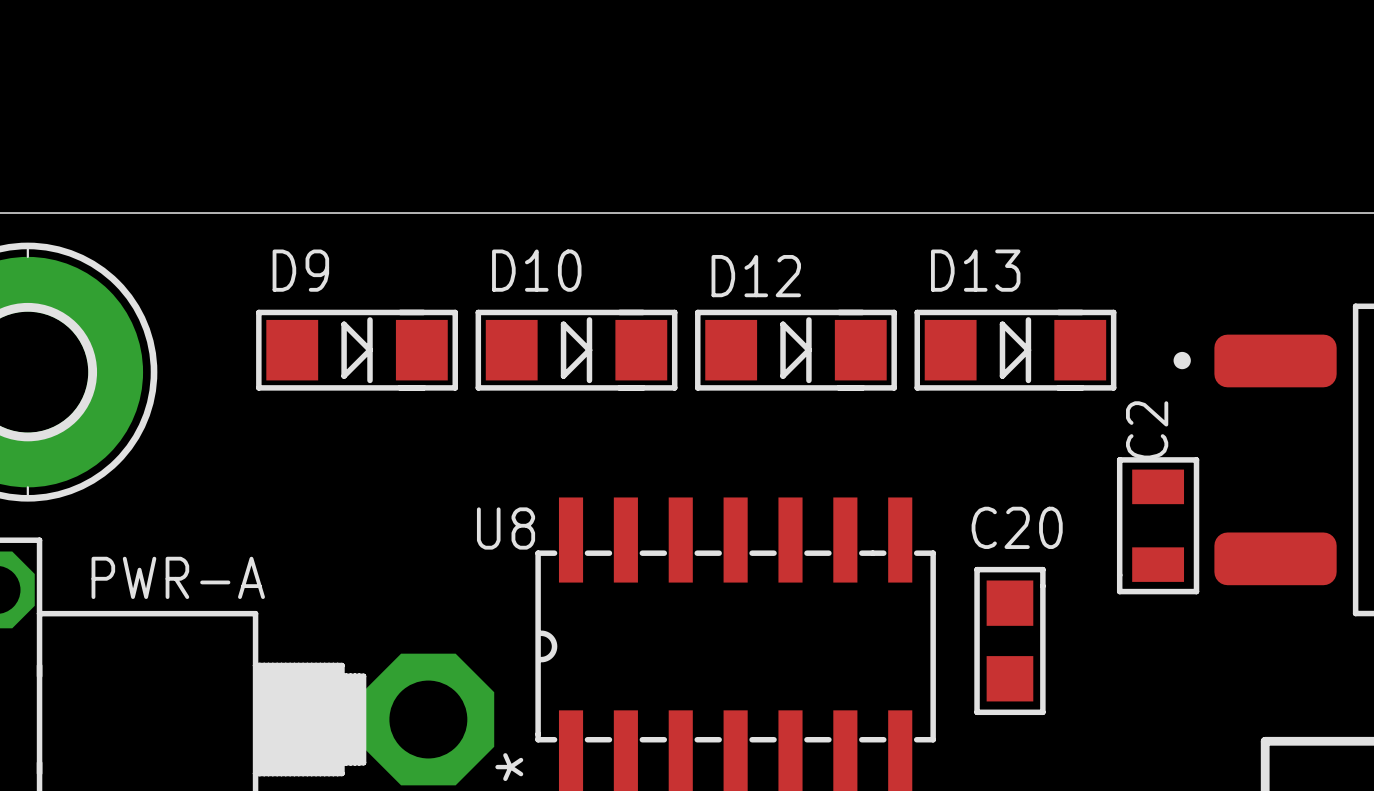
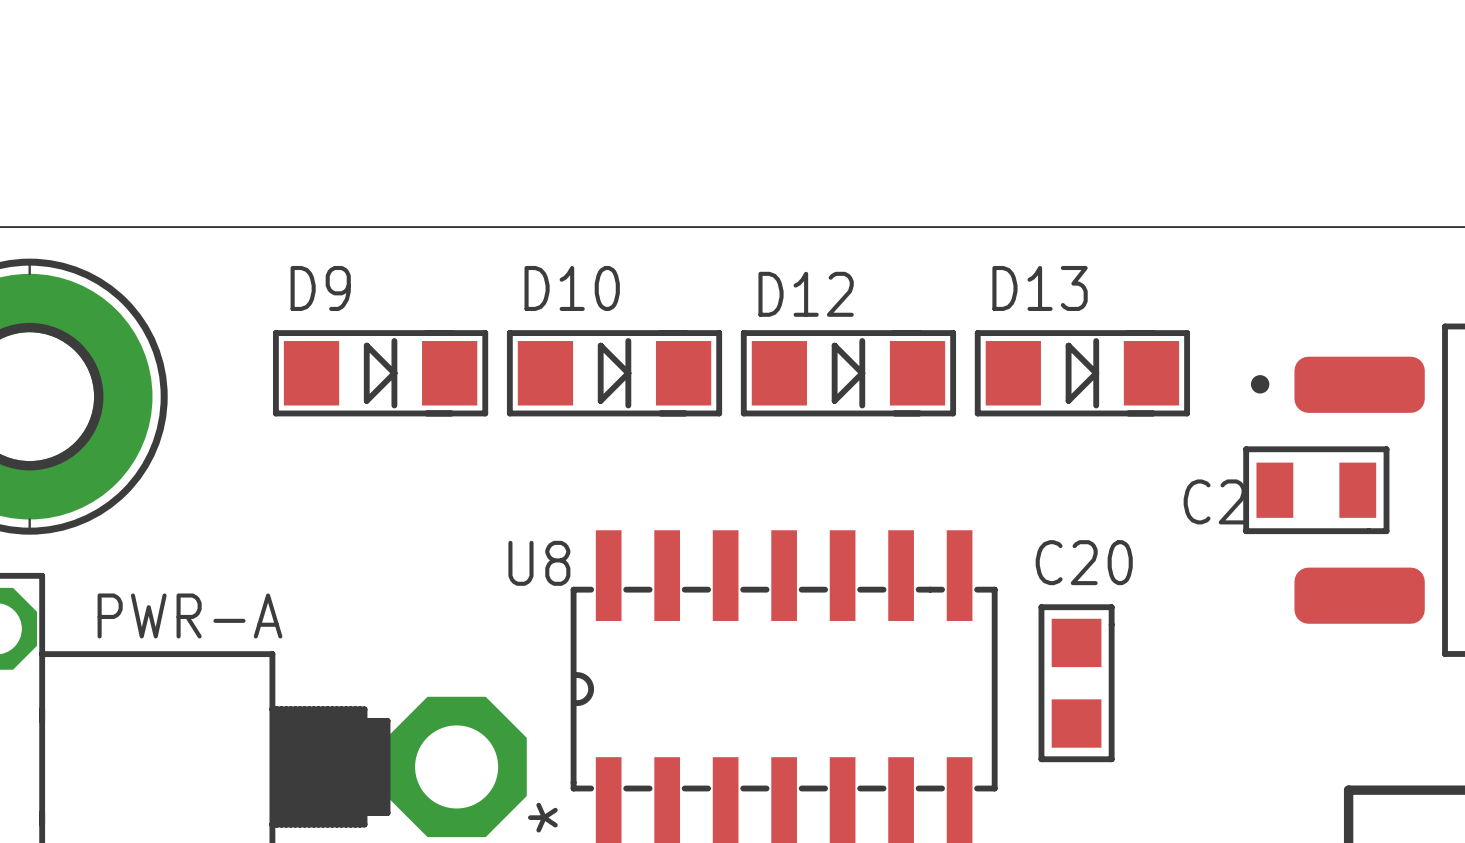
C2 rotation: 0° (1158, 525) -> 90° counterclockwise (1316, 490)
C2 position: (1158, 525) -> (1316, 490)

